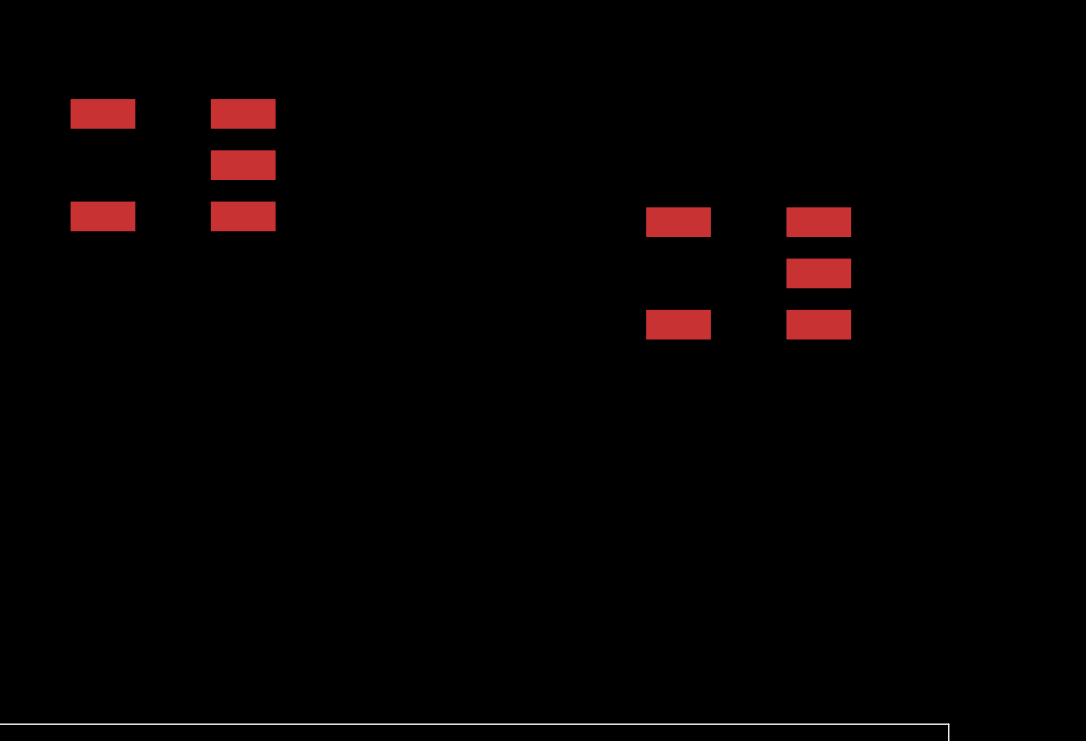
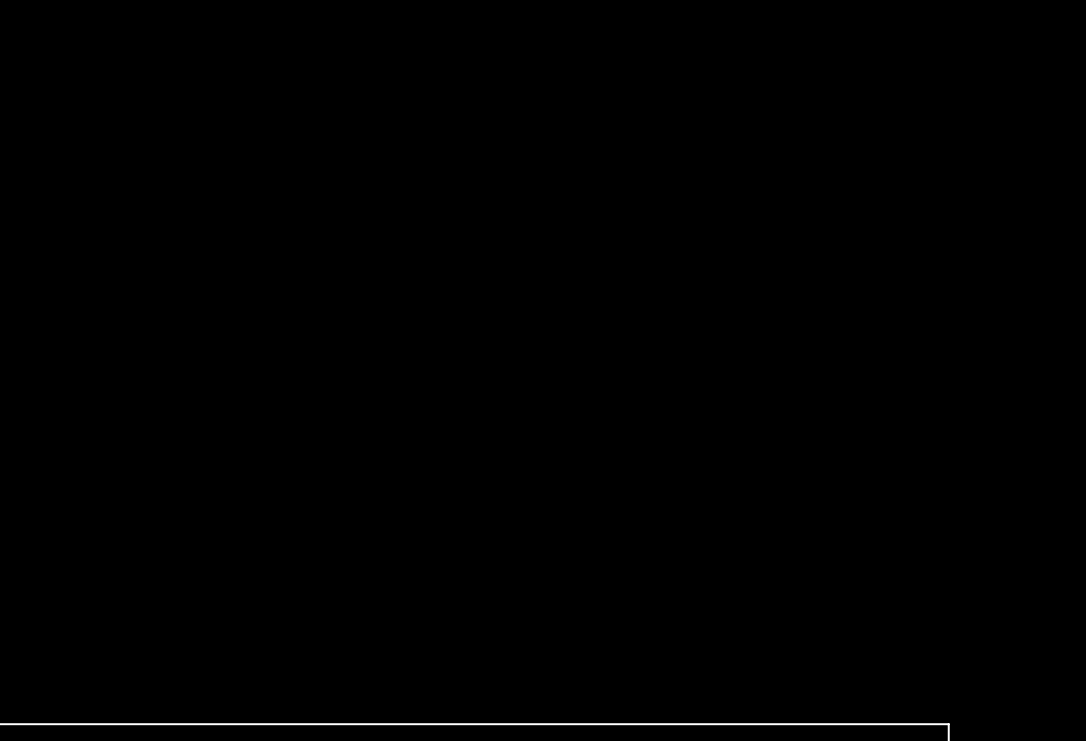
part: (173, 165) -> none
part: (748, 273) -> none

